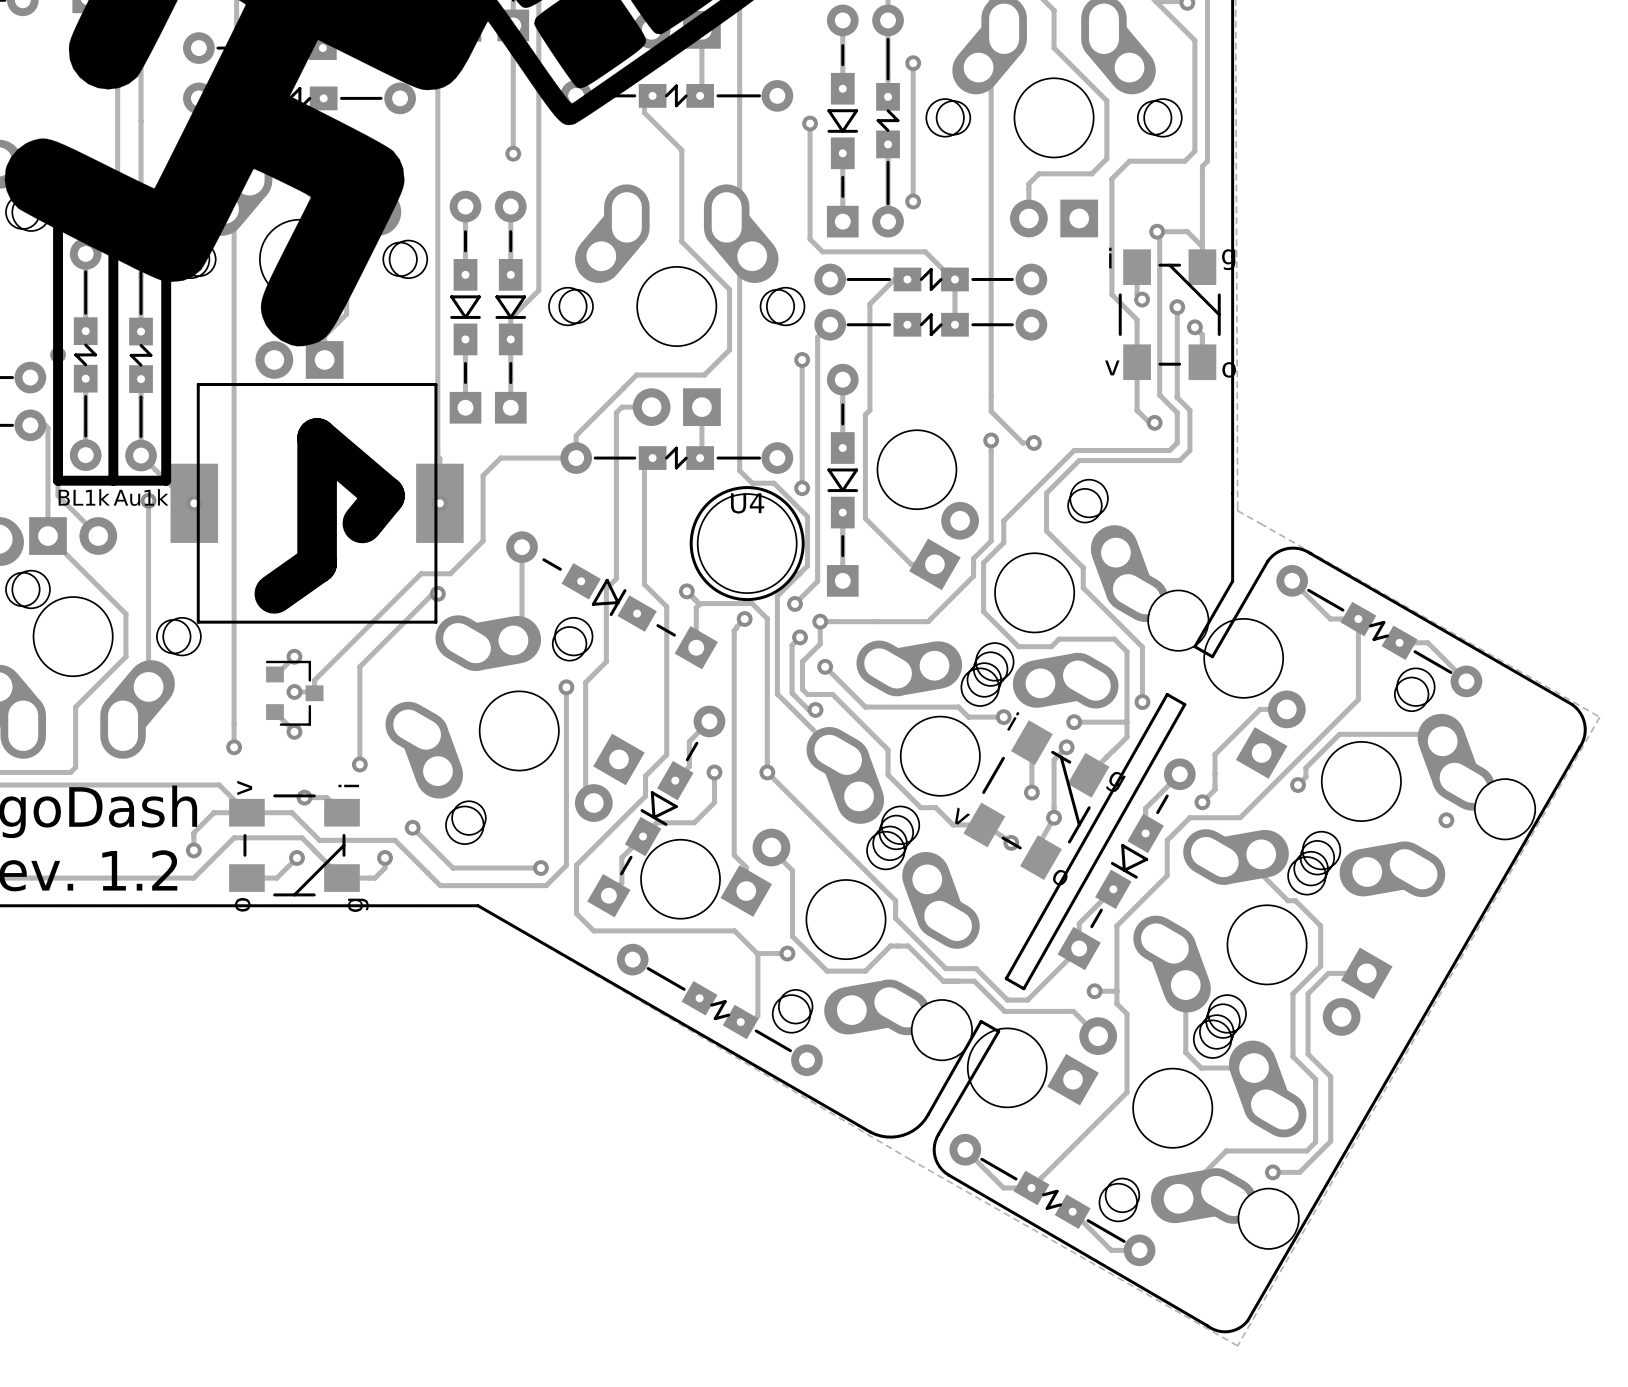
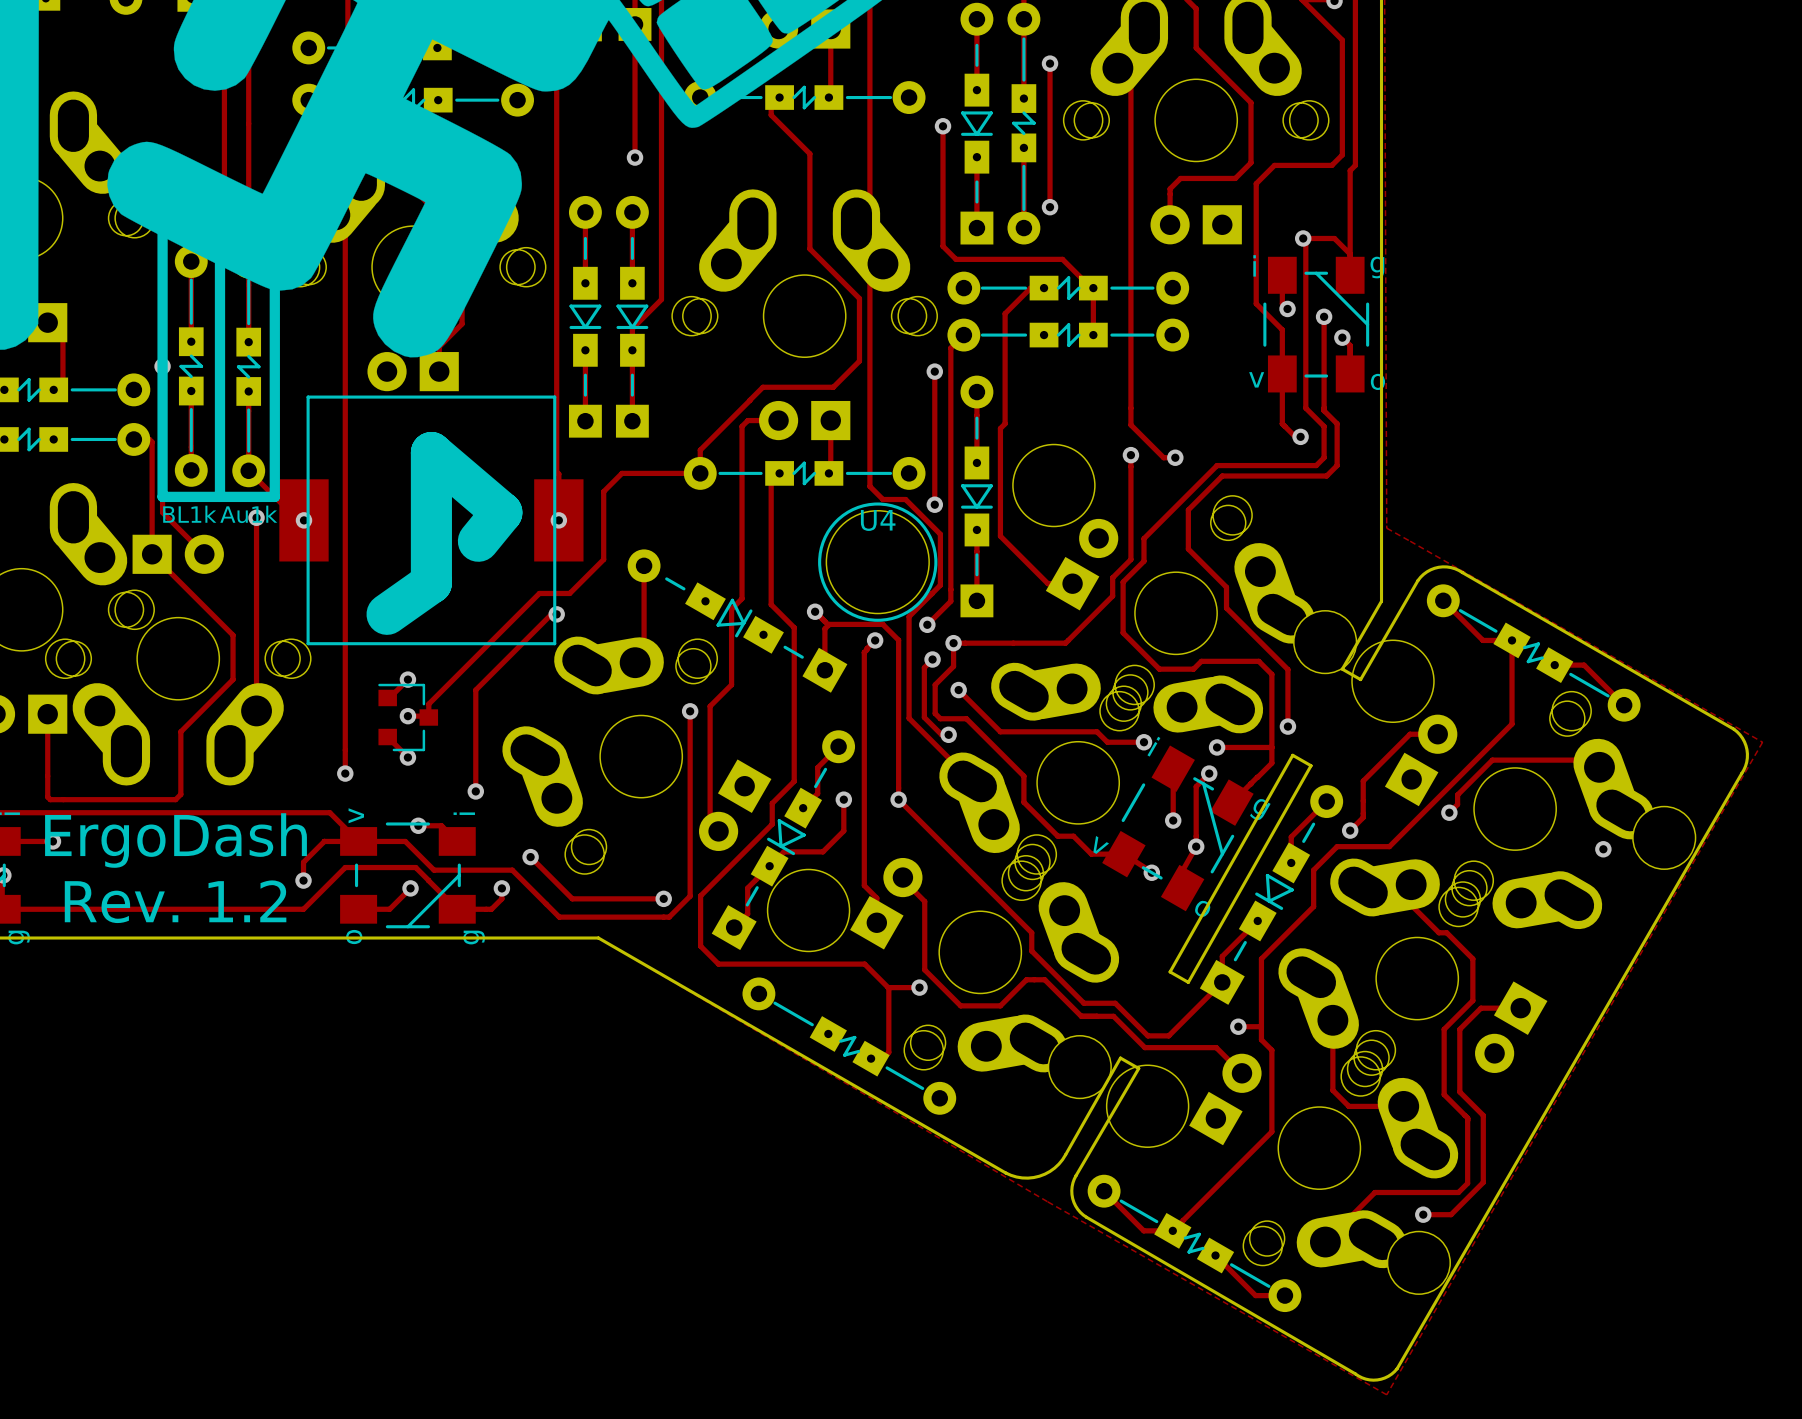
board edge: (1167, 694) (1006, 978) (1023, 988) (1184, 704) (1167, 694) -> (1292, 755) (1170, 971) (1188, 982) (1311, 765) (1292, 755)

